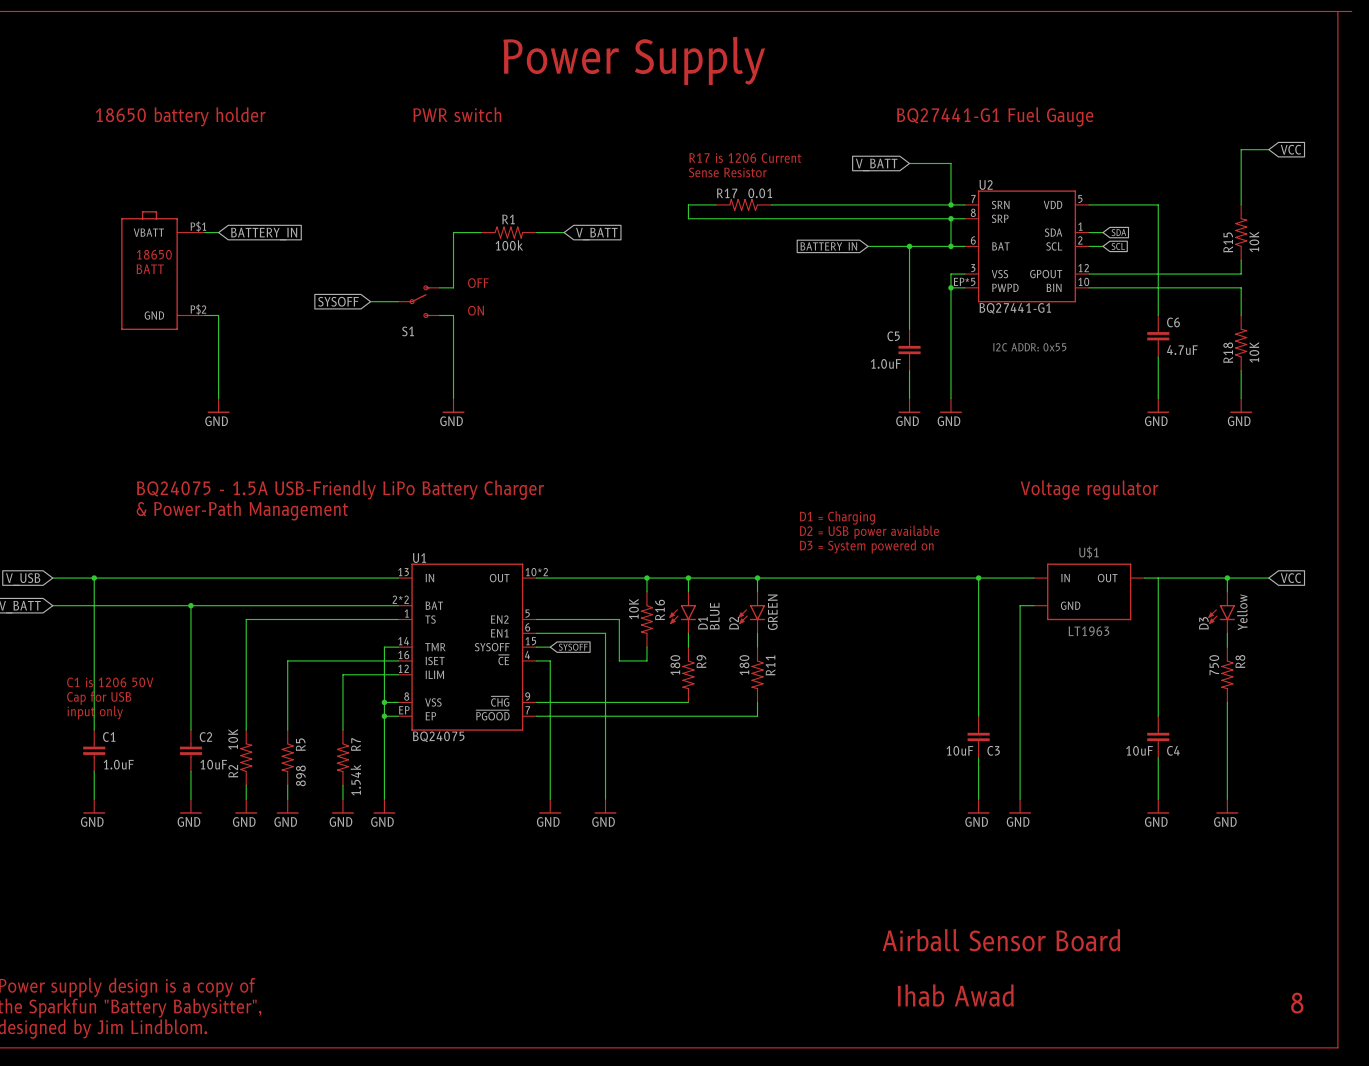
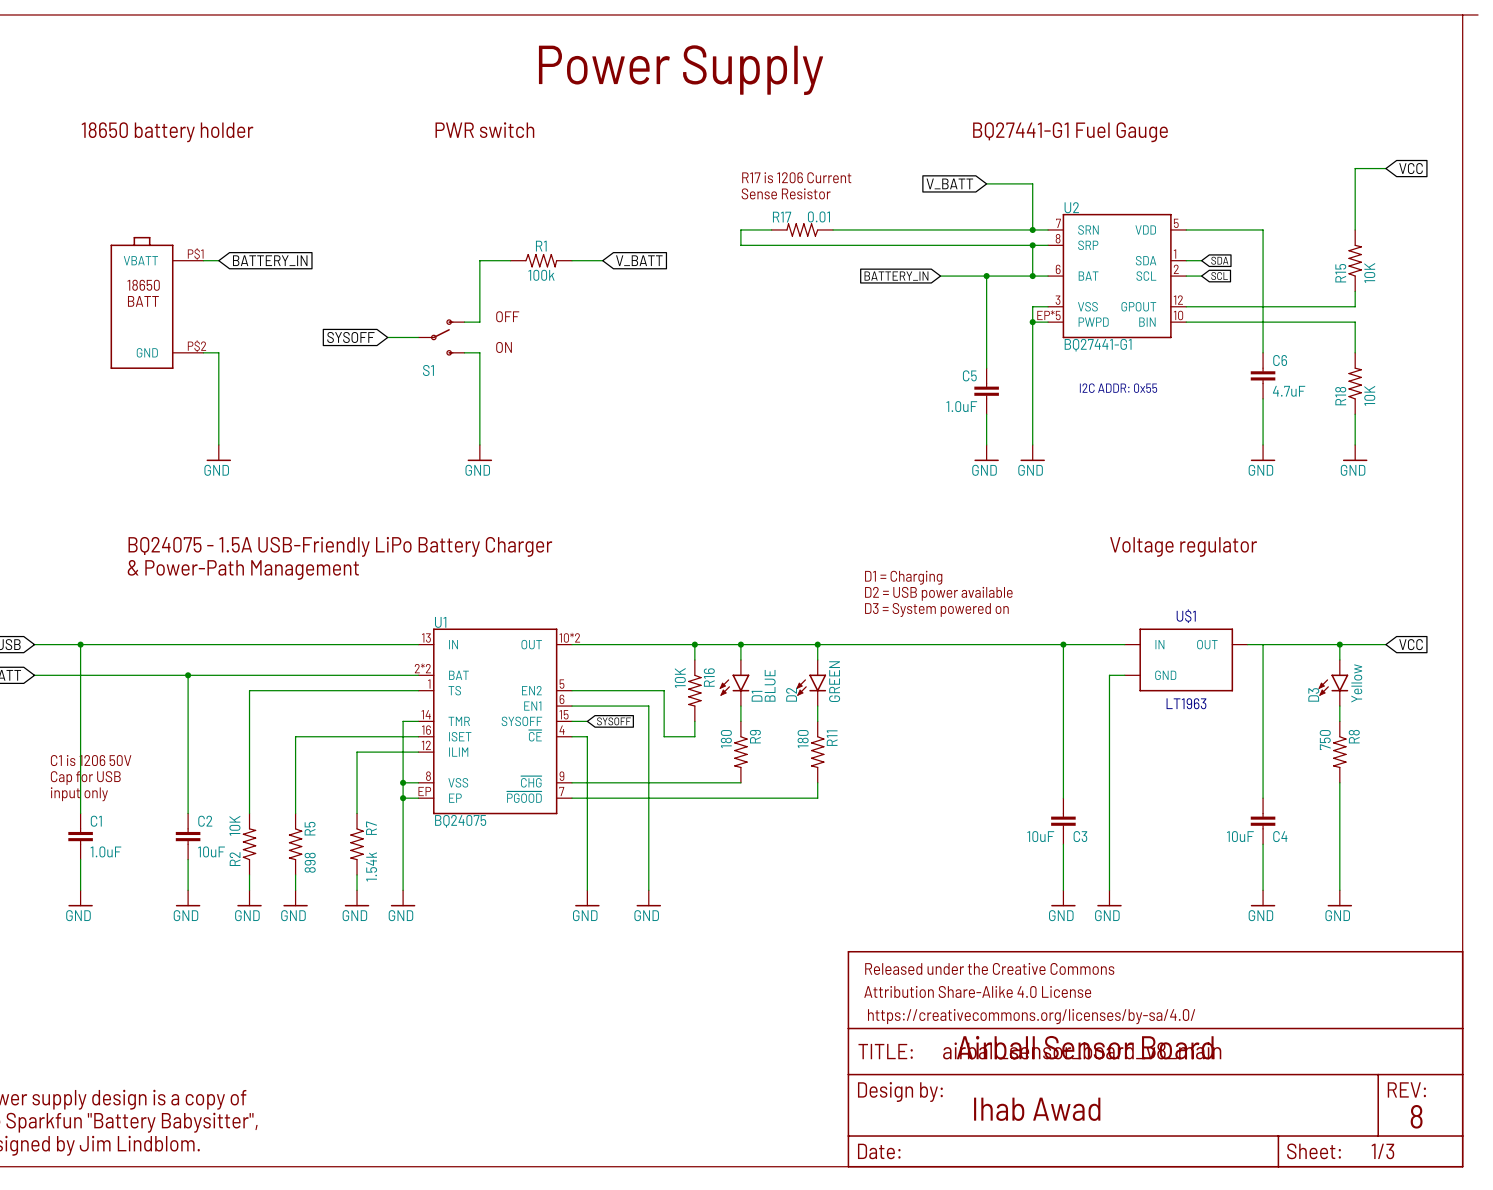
part: none -> (1155, 1059)

